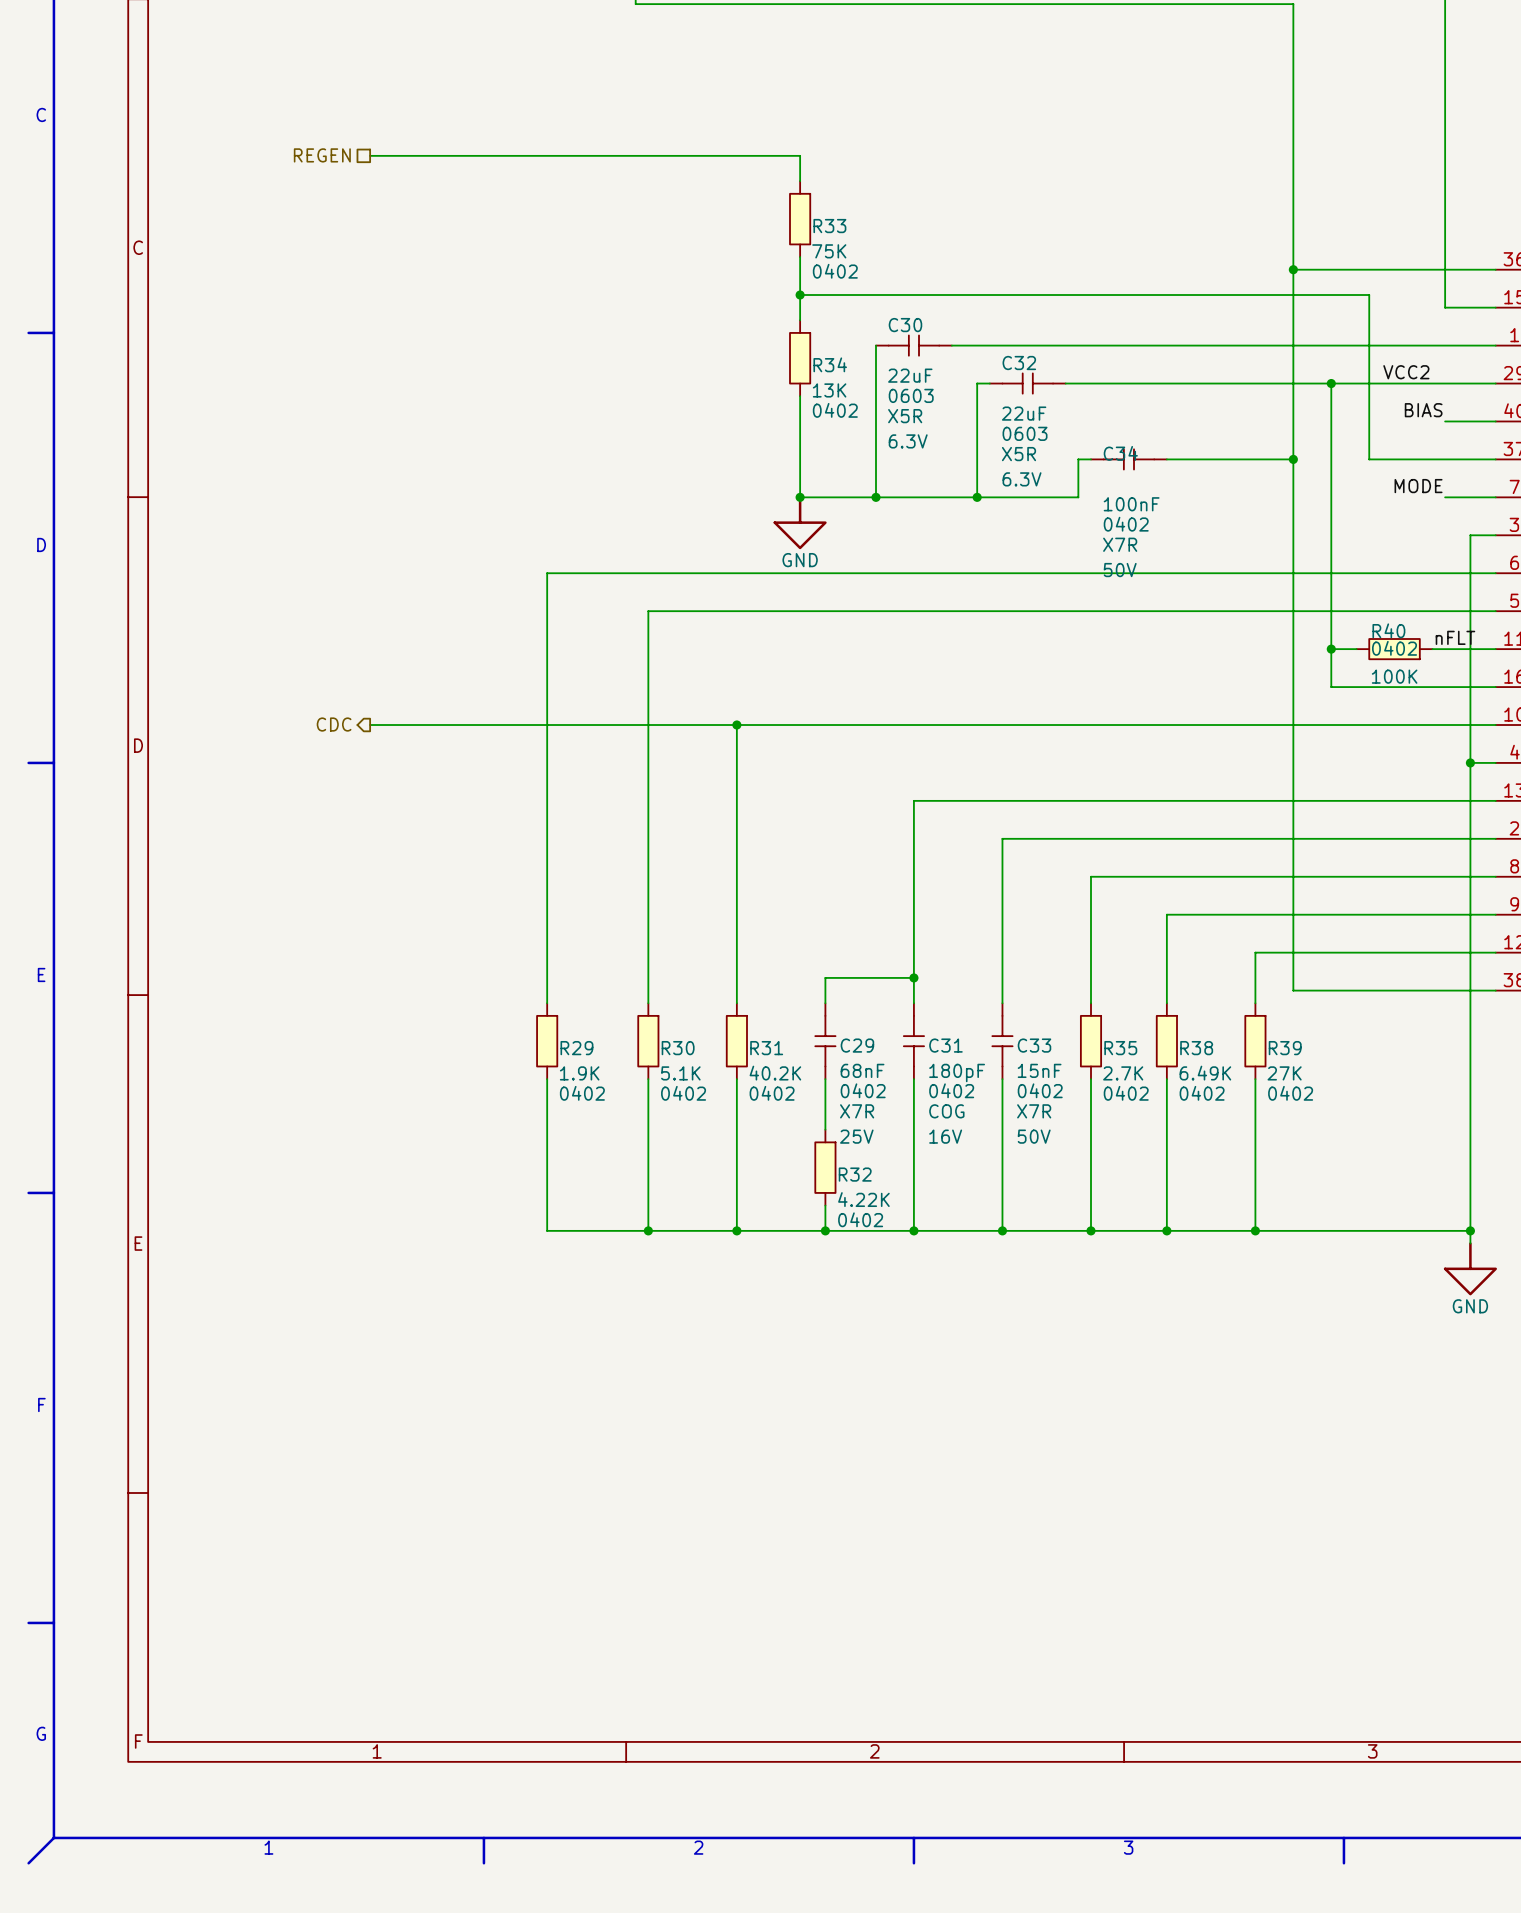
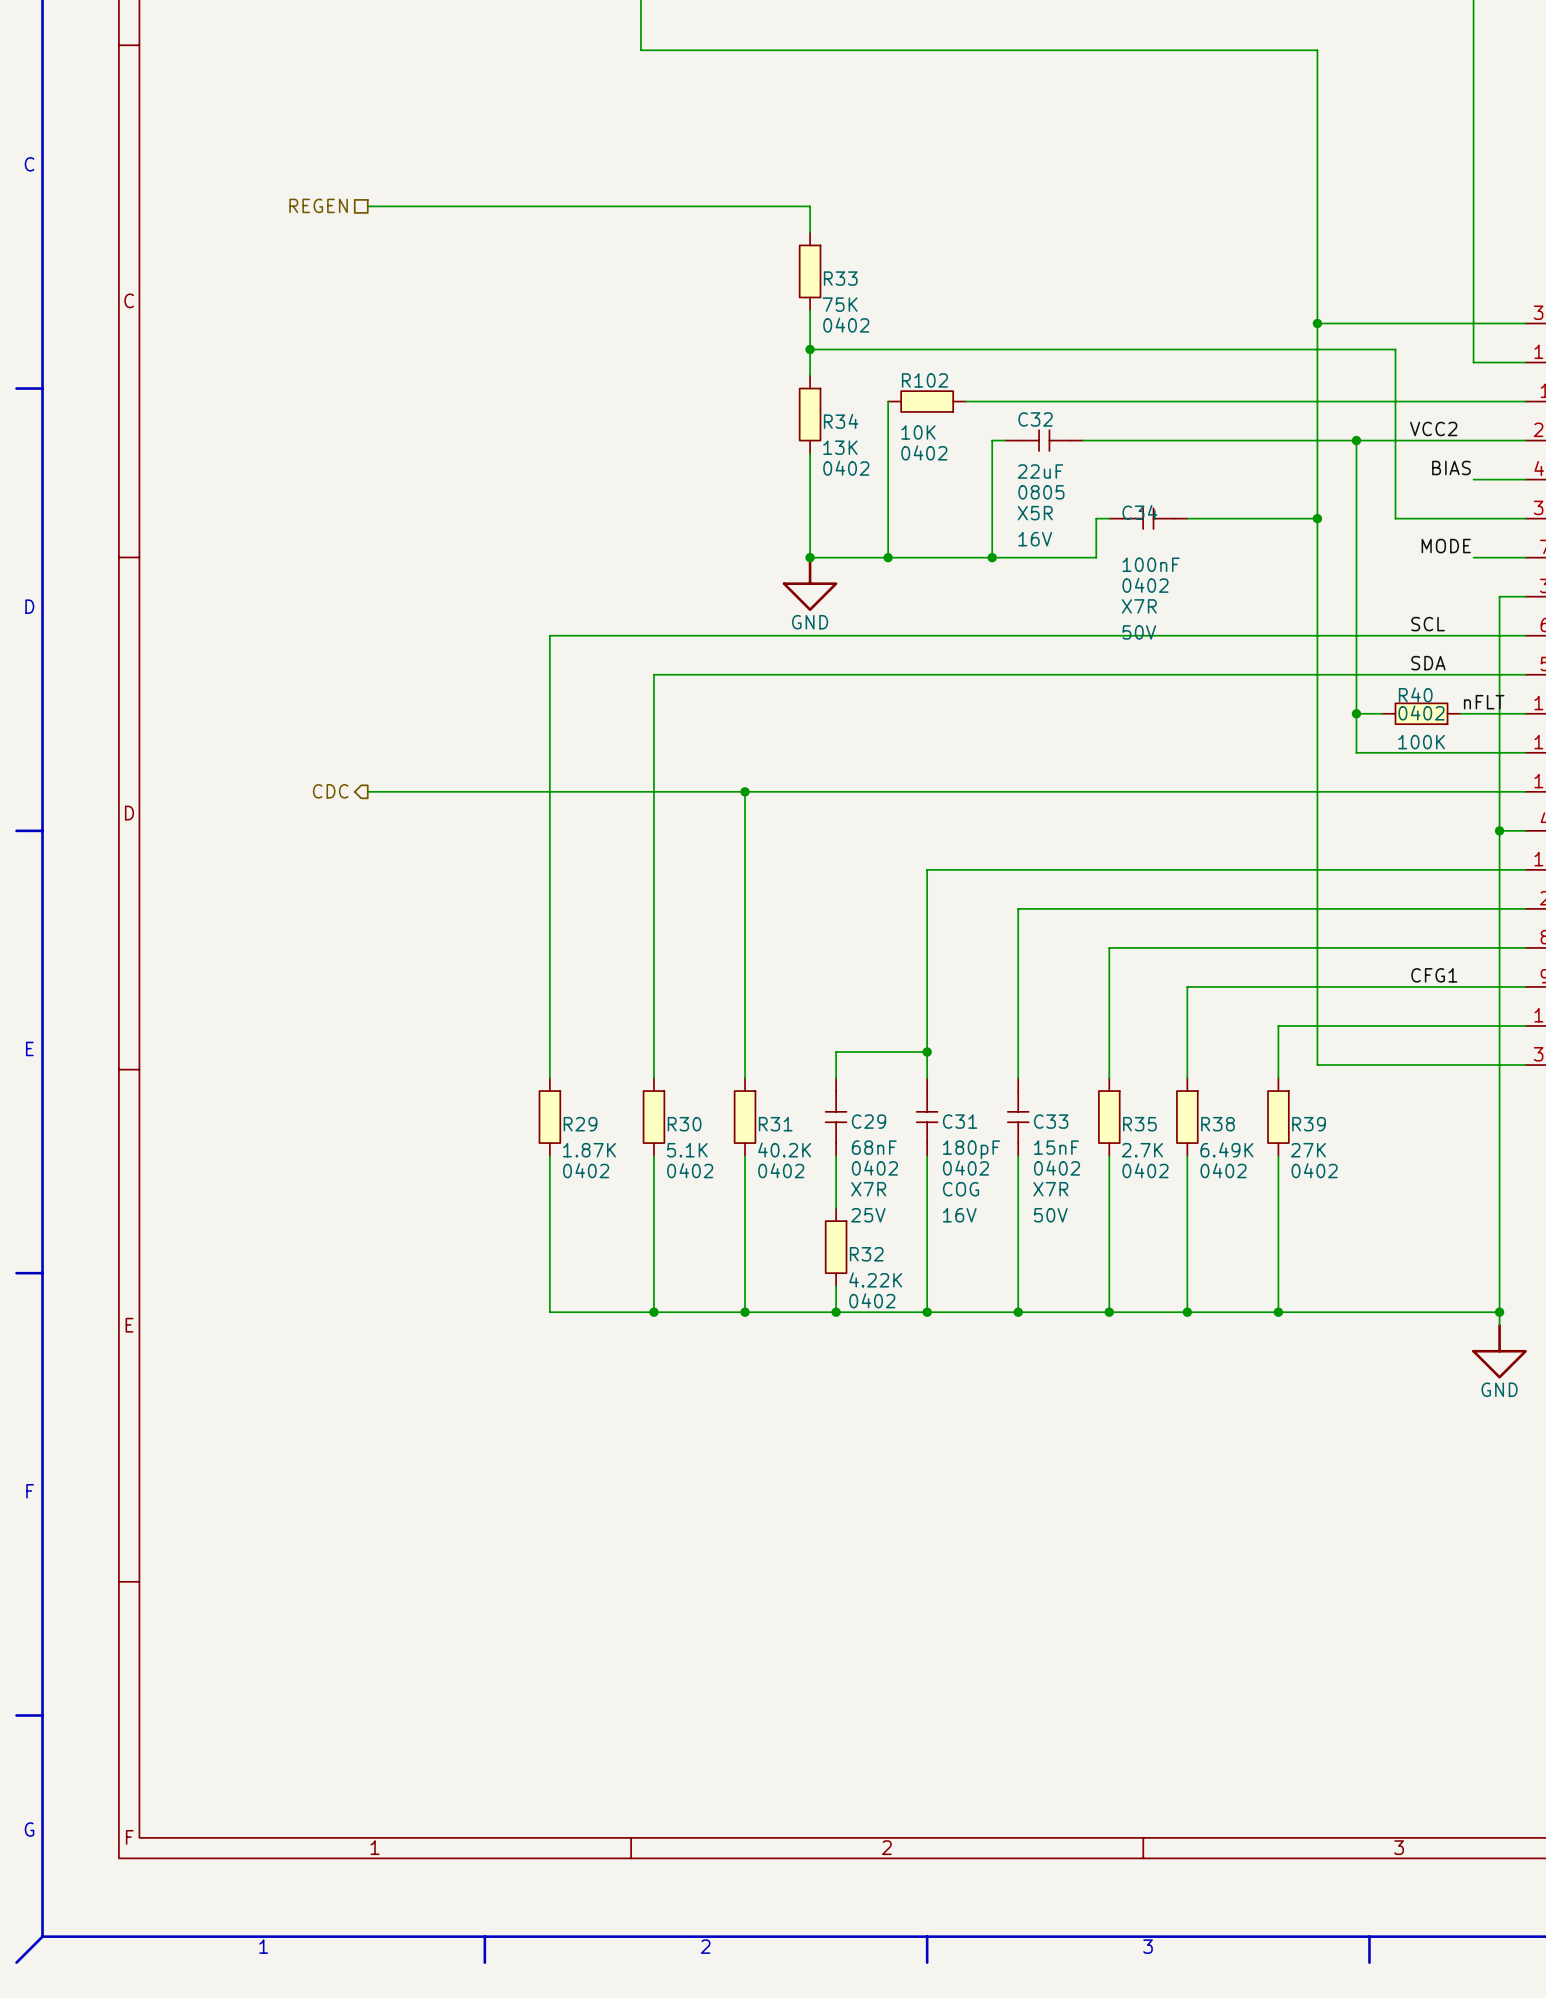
C30: (913, 345) -> none
R102: none -> (927, 401)
C32 text: 0603 (1025, 433) -> 0805 (1041, 492)
C32 text: 6.3V (1022, 479) -> 16V (1035, 539)
label: none -> SCL (1428, 624)
label: none -> SDA (1428, 663)
label: none -> CFG1 (1434, 975)
R29 text: 1.9K (579, 1073) -> 1.87K (589, 1150)

